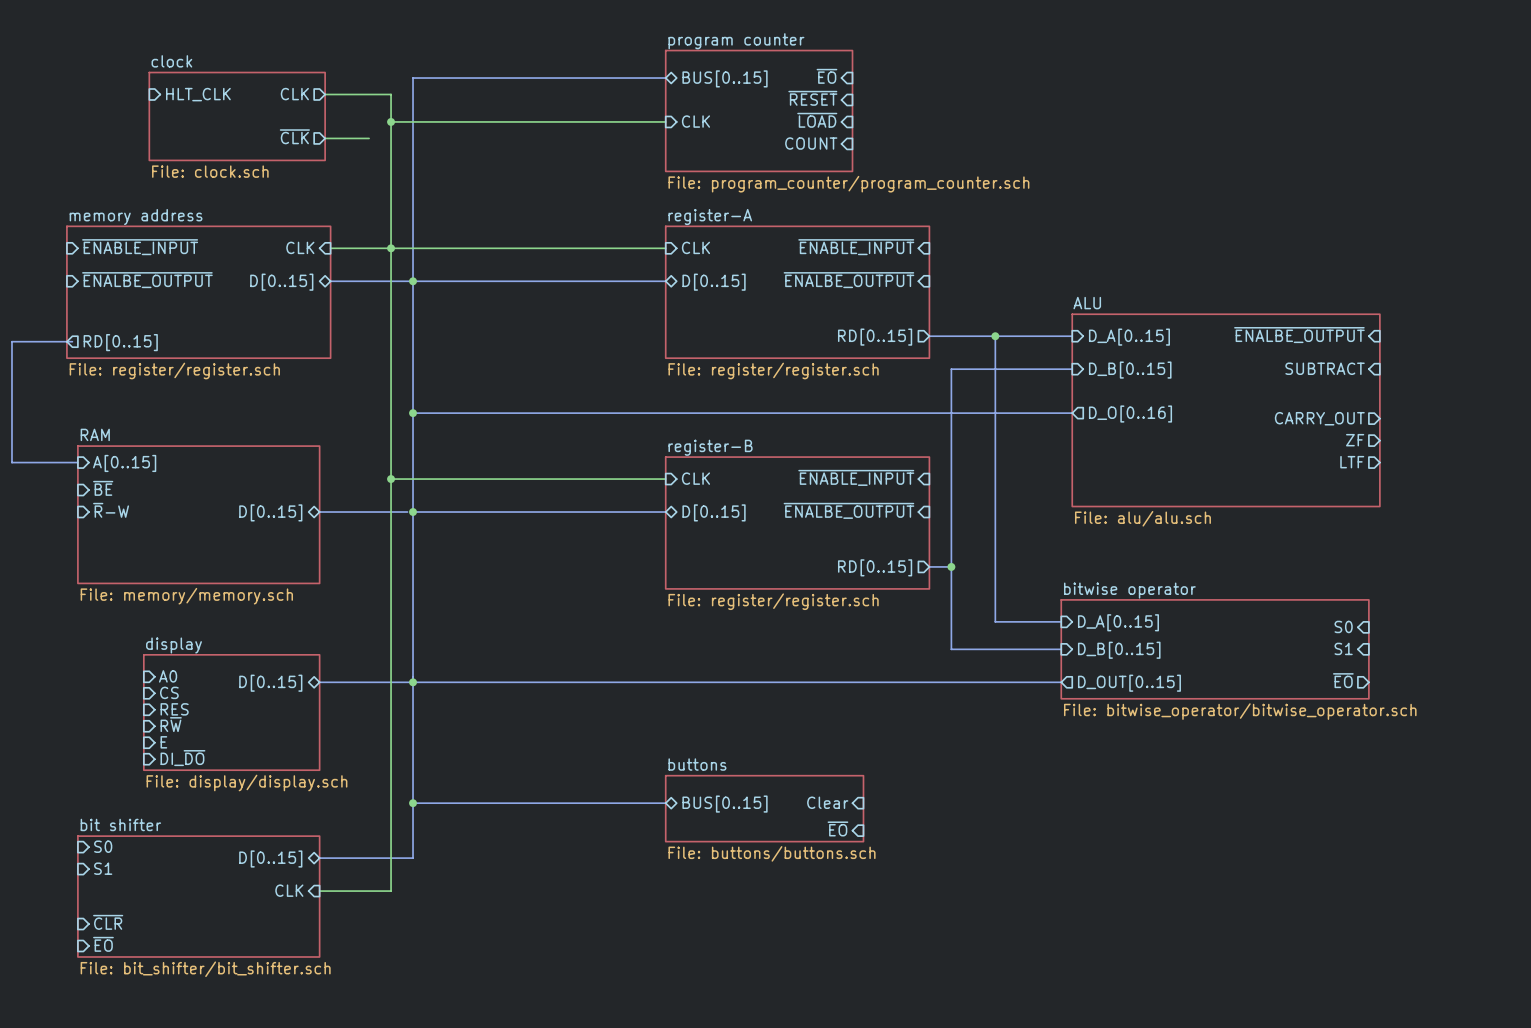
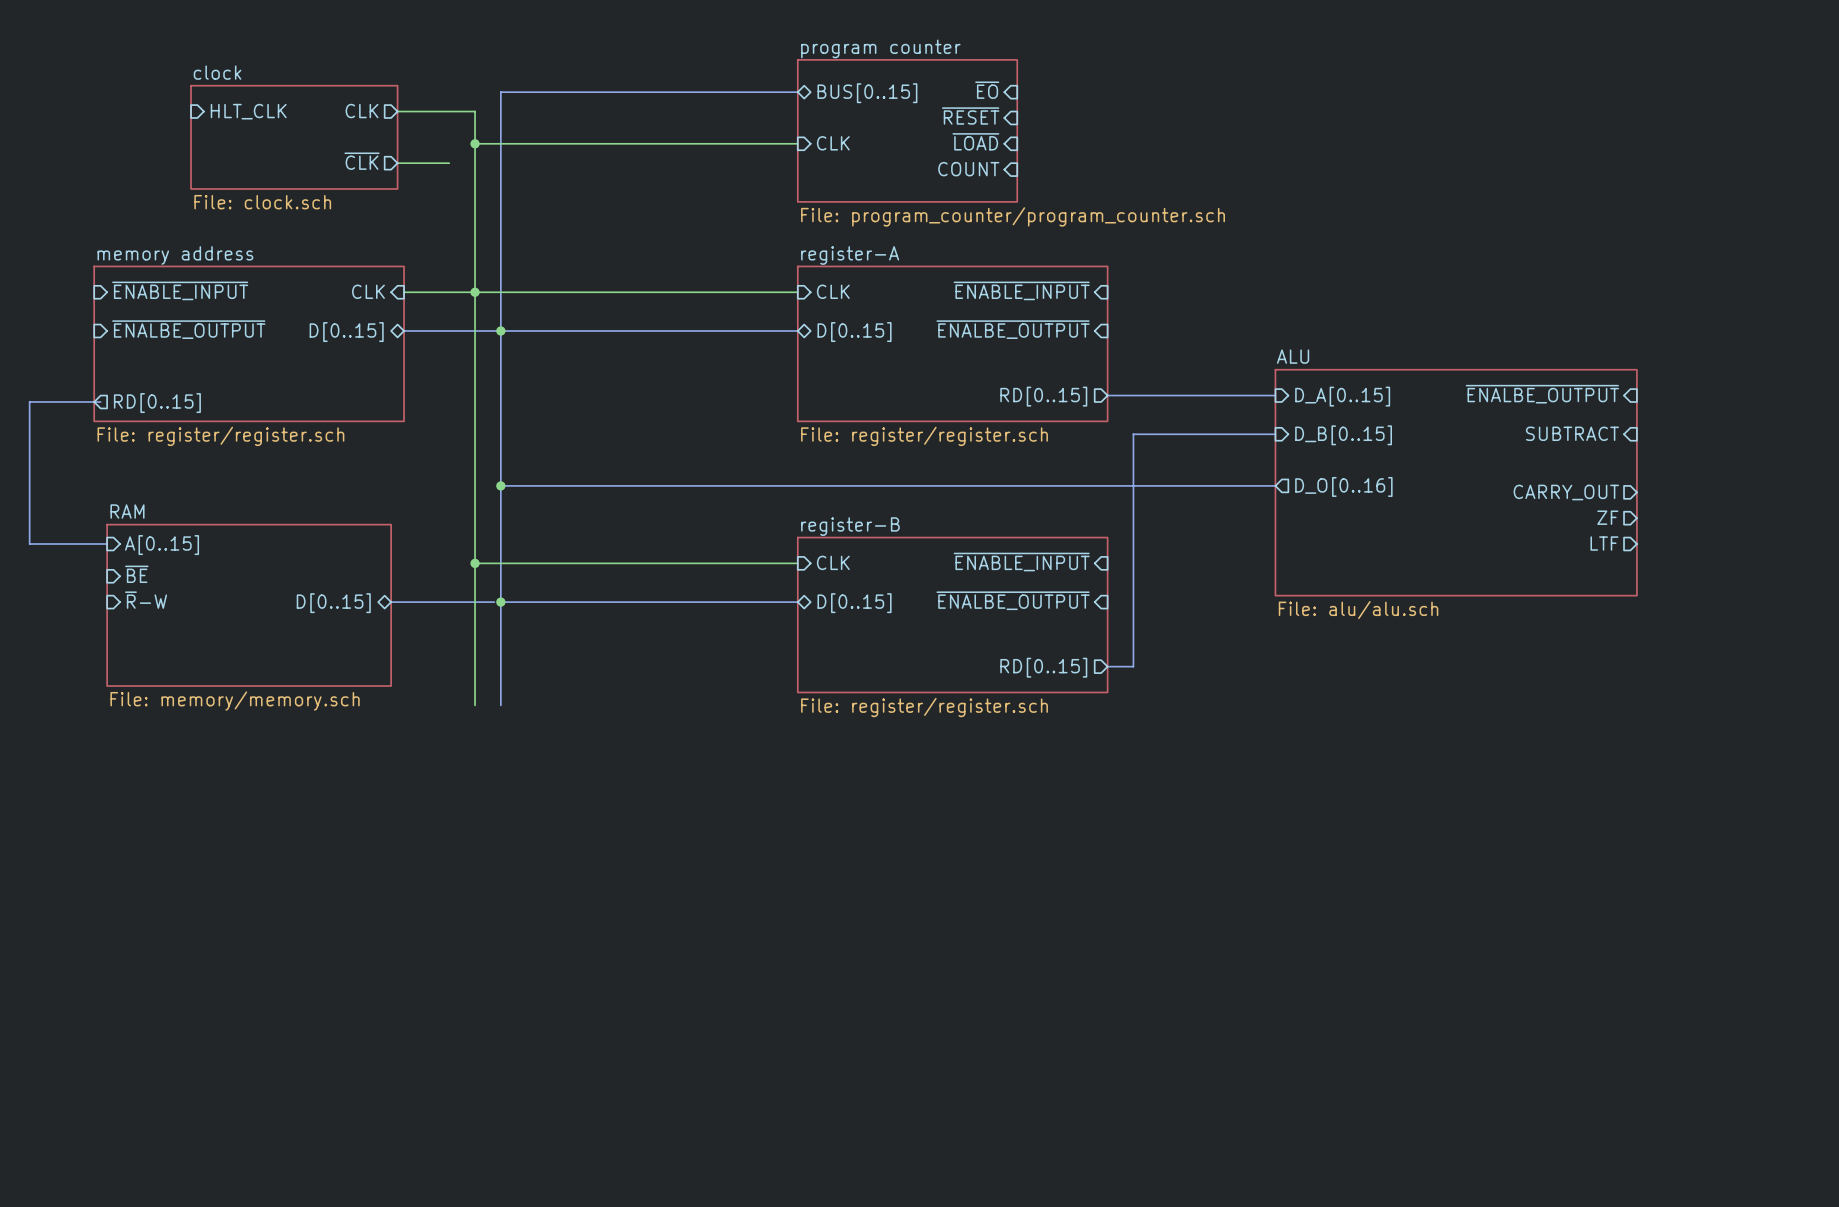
bus: (995, 336) (995, 621) (1061, 621) -> none
junction: (995, 336) -> none
bus: (951, 566) (951, 649) (1061, 649) -> none
junction: (951, 566) -> none
wire: (391, 599) (391, 891) (319, 891) -> none
bus: (413, 599) (413, 858) (319, 858) -> none
sheet pin: D_A[0..15] (1118, 622) -> none
sheet pin: S0 (1343, 626) -> none
sheet pin: S1 (1343, 648) -> none
sheet bitwise operator: File: bitwise_operator/bitwise_operator.sch (1215, 649) -> none
sheet pin: D_B[0..15] (1119, 650) -> none
sheet pin: A0 (168, 676) -> none
sheet pin: ~{EO} (1343, 680) -> none
bus: (319, 682) (1061, 682) -> none
junction: (413, 682) -> none
sheet pin: D[0..15] (270, 683) -> none
sheet pin: D_OUT[0..15] (1129, 683) -> none
sheet pin: CS (169, 692) -> none
sheet pin: RES (174, 709) -> none
sheet display: File: display/display.sch (231, 712) -> none
sheet pin: R~{W} (171, 724) -> none
sheet pin: E (163, 742) -> none
sheet pin: DI_~{DO} (182, 758) -> none
sheet pin: Clear (827, 802) -> none
bus: (413, 803) (665, 803) -> none
junction: (413, 803) -> none
sheet pin: BUS[0..15] (725, 804) -> none
sheet buttons: File: buttons/buttons.sch (764, 808) -> none
sheet pin: ~{EO} (837, 828) -> none
sheet pin: S0 (103, 846) -> none
sheet pin: D[0..15] (270, 859) -> none
sheet pin: S1 (103, 868) -> none
sheet pin: CLK (289, 890) -> none
sheet bit shifter: File: bit_shifter/bit_shifter.sch (198, 896) -> none
sheet pin: ~{CLR} (108, 922) -> none
sheet pin: ~{EO} (103, 944) -> none

